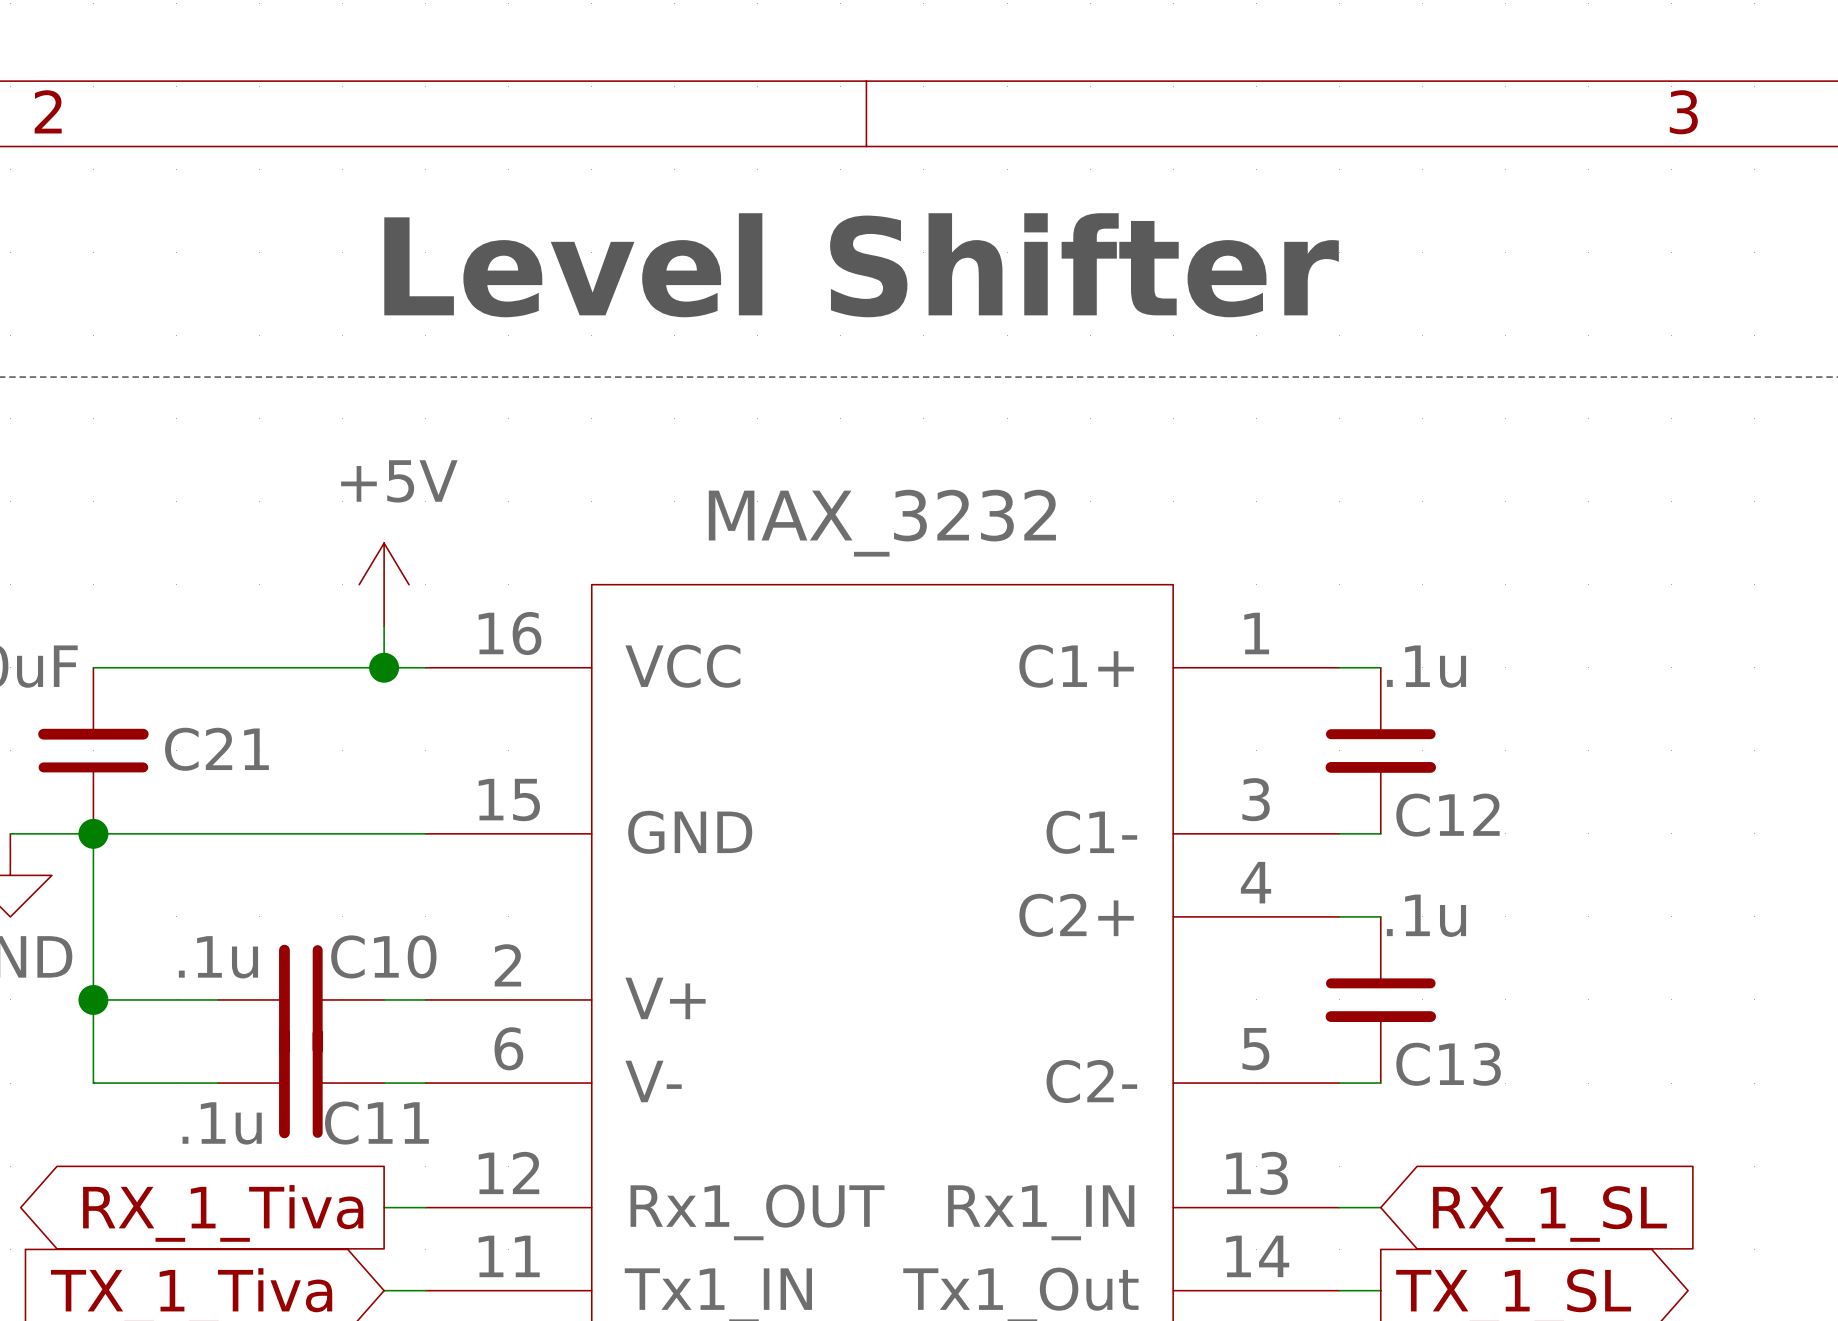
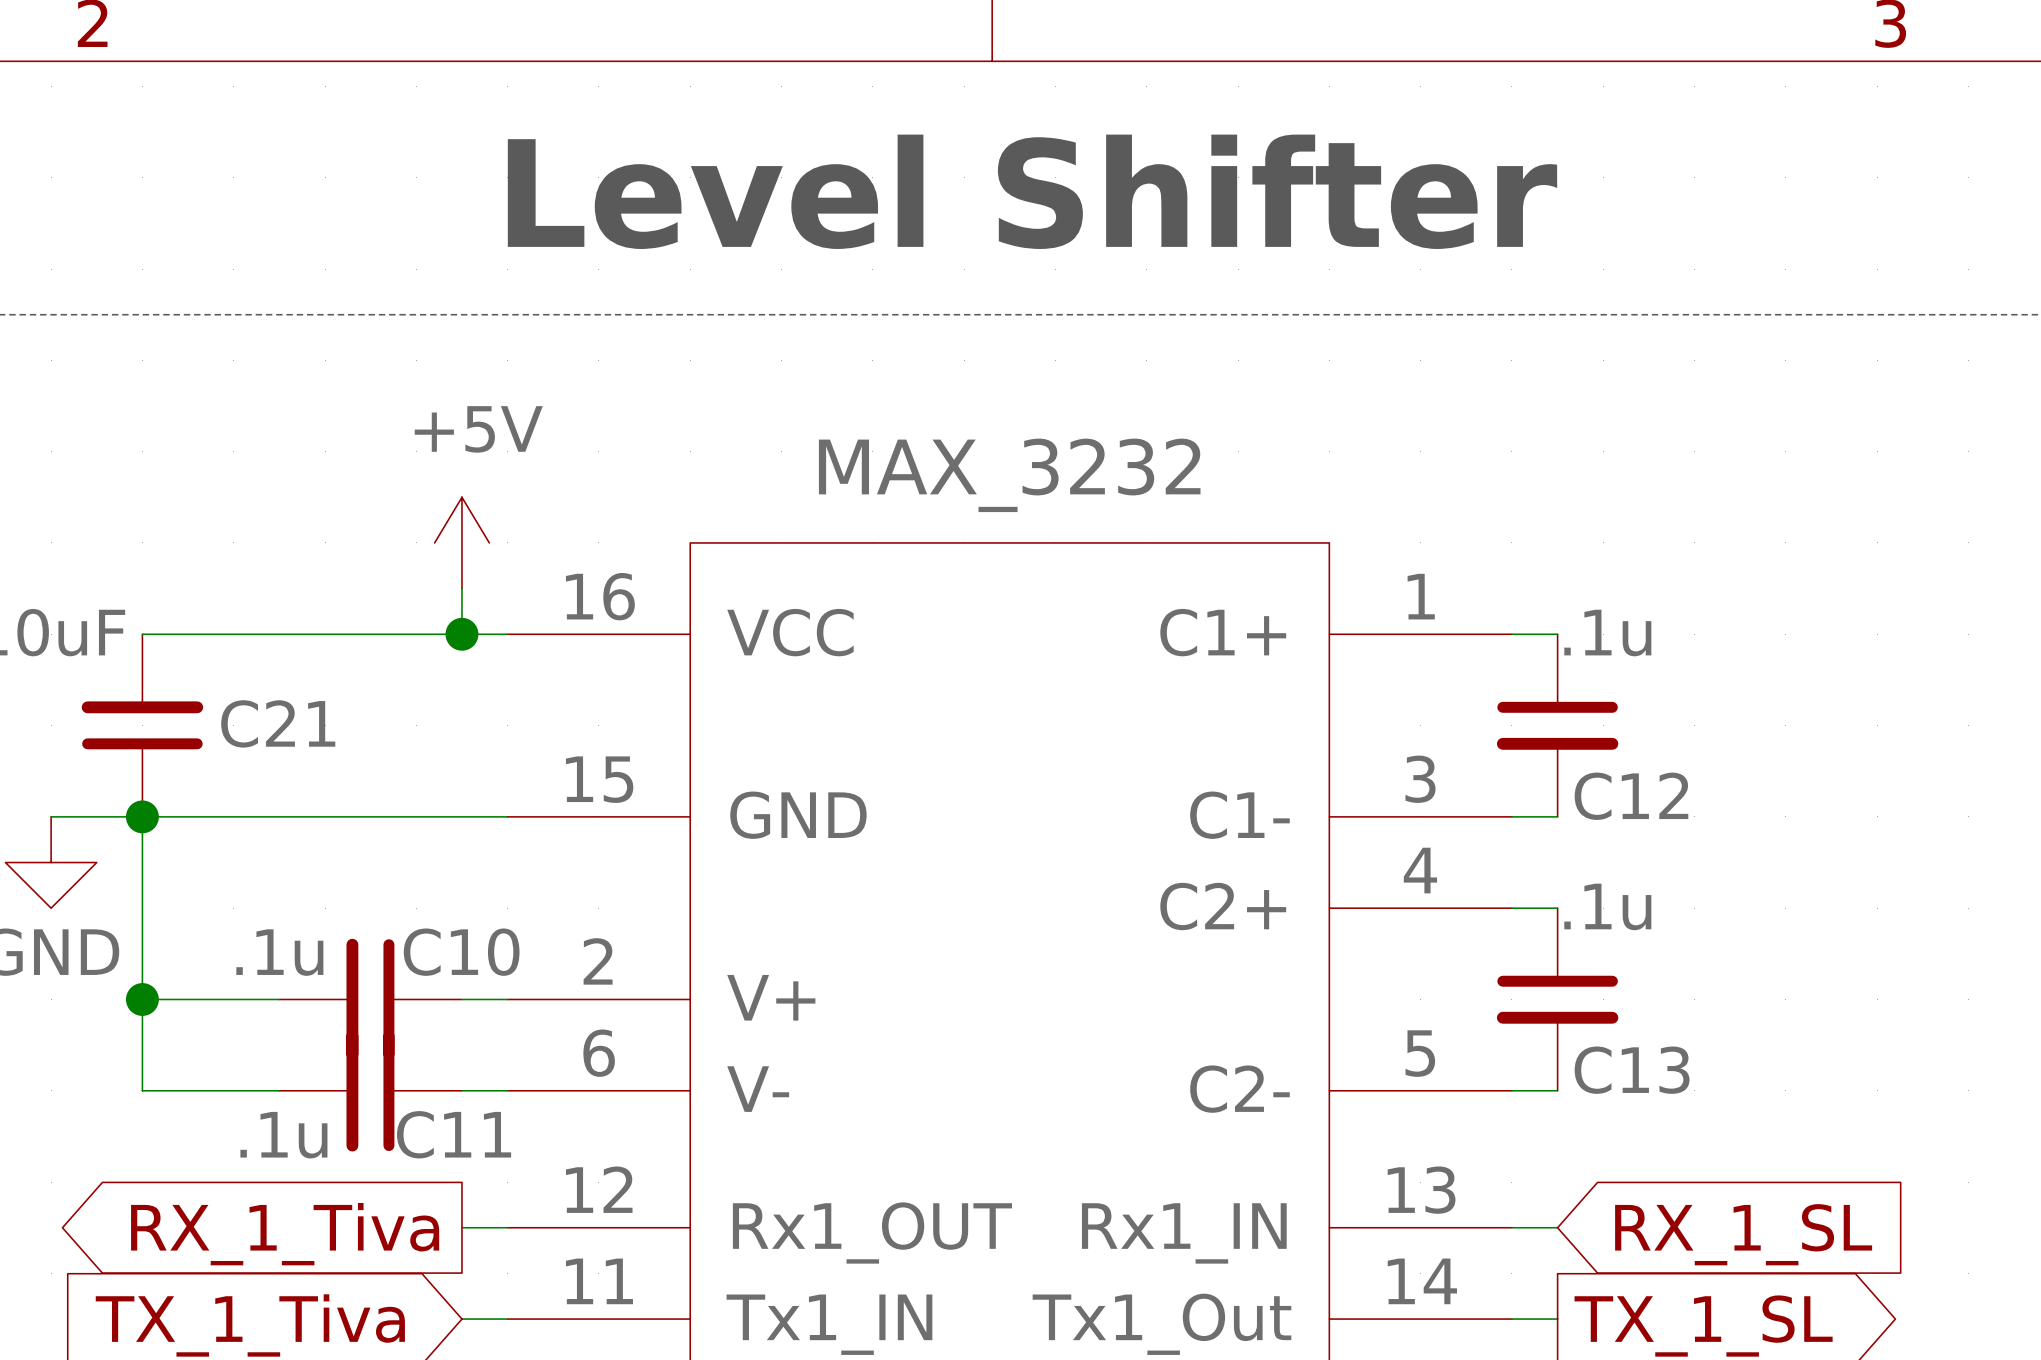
text position: Level Shifter (861, 265) -> Level Shifter (1032, 191)

